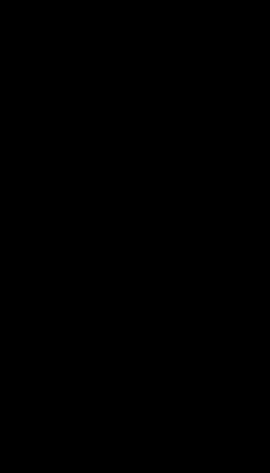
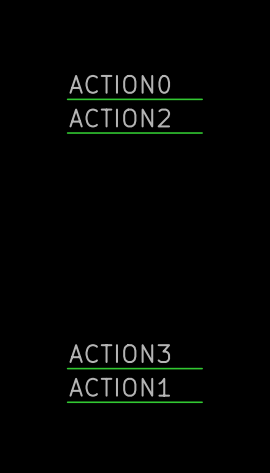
label: none -> ACTION0 (119, 84)
wire: none -> (67, 99) (202, 99)
label: none -> ACTION2 (119, 118)
wire: none -> (67, 133) (202, 133)
label: none -> ACTION3 (119, 353)
wire: none -> (67, 368) (202, 368)
label: none -> ACTION1 (119, 387)
wire: none -> (67, 402) (202, 402)

